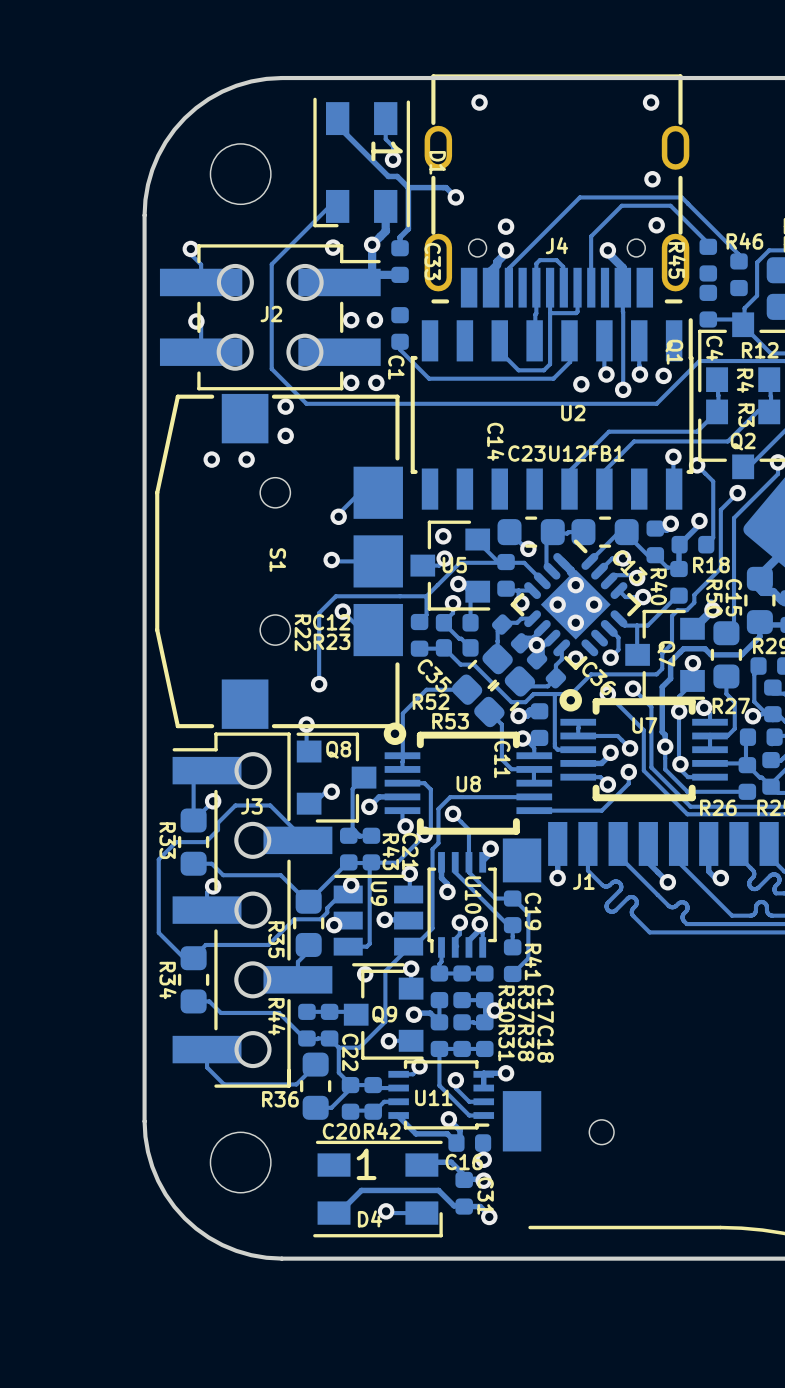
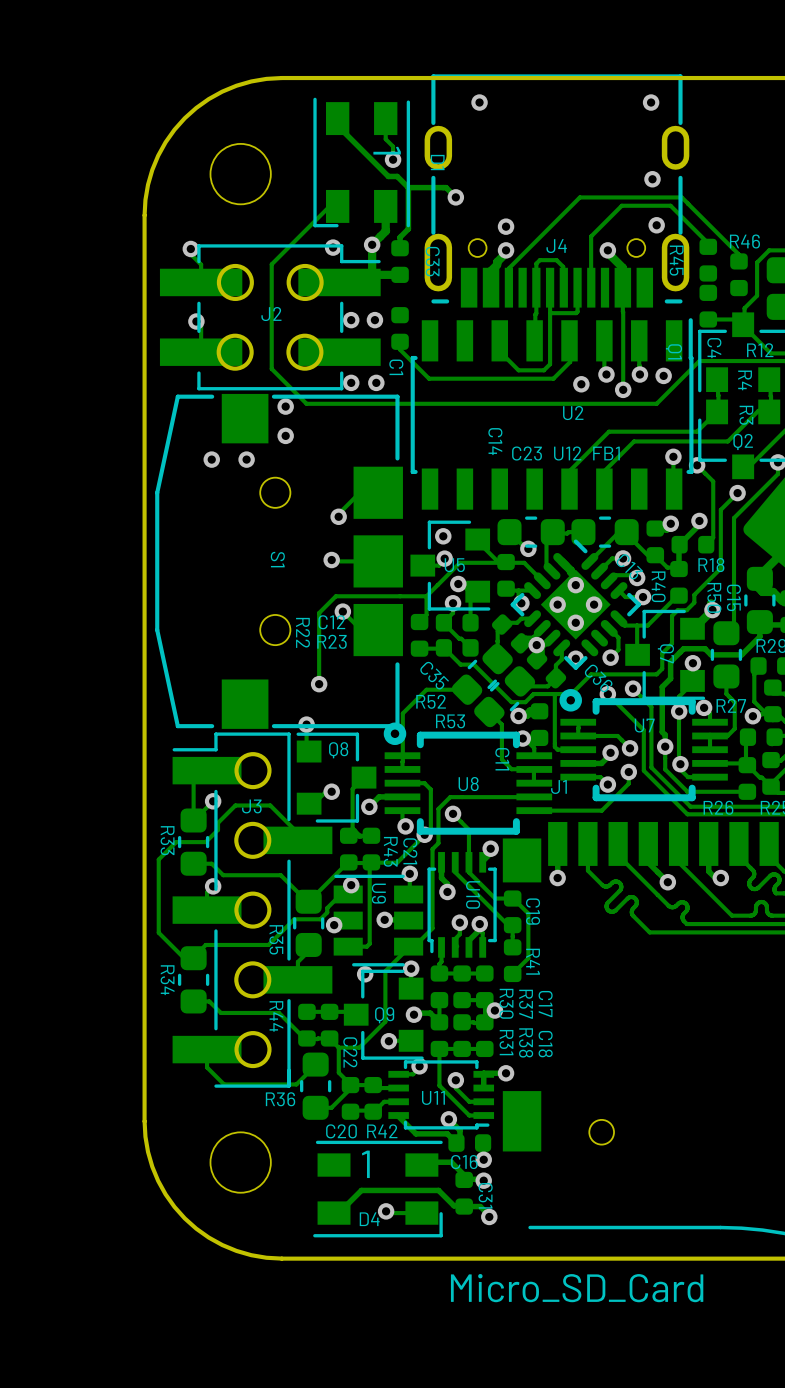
J1 name position: J1 (583, 881) -> J1 (558, 787)
J1 value: none -> Micro_SD_Card (577, 1288)

